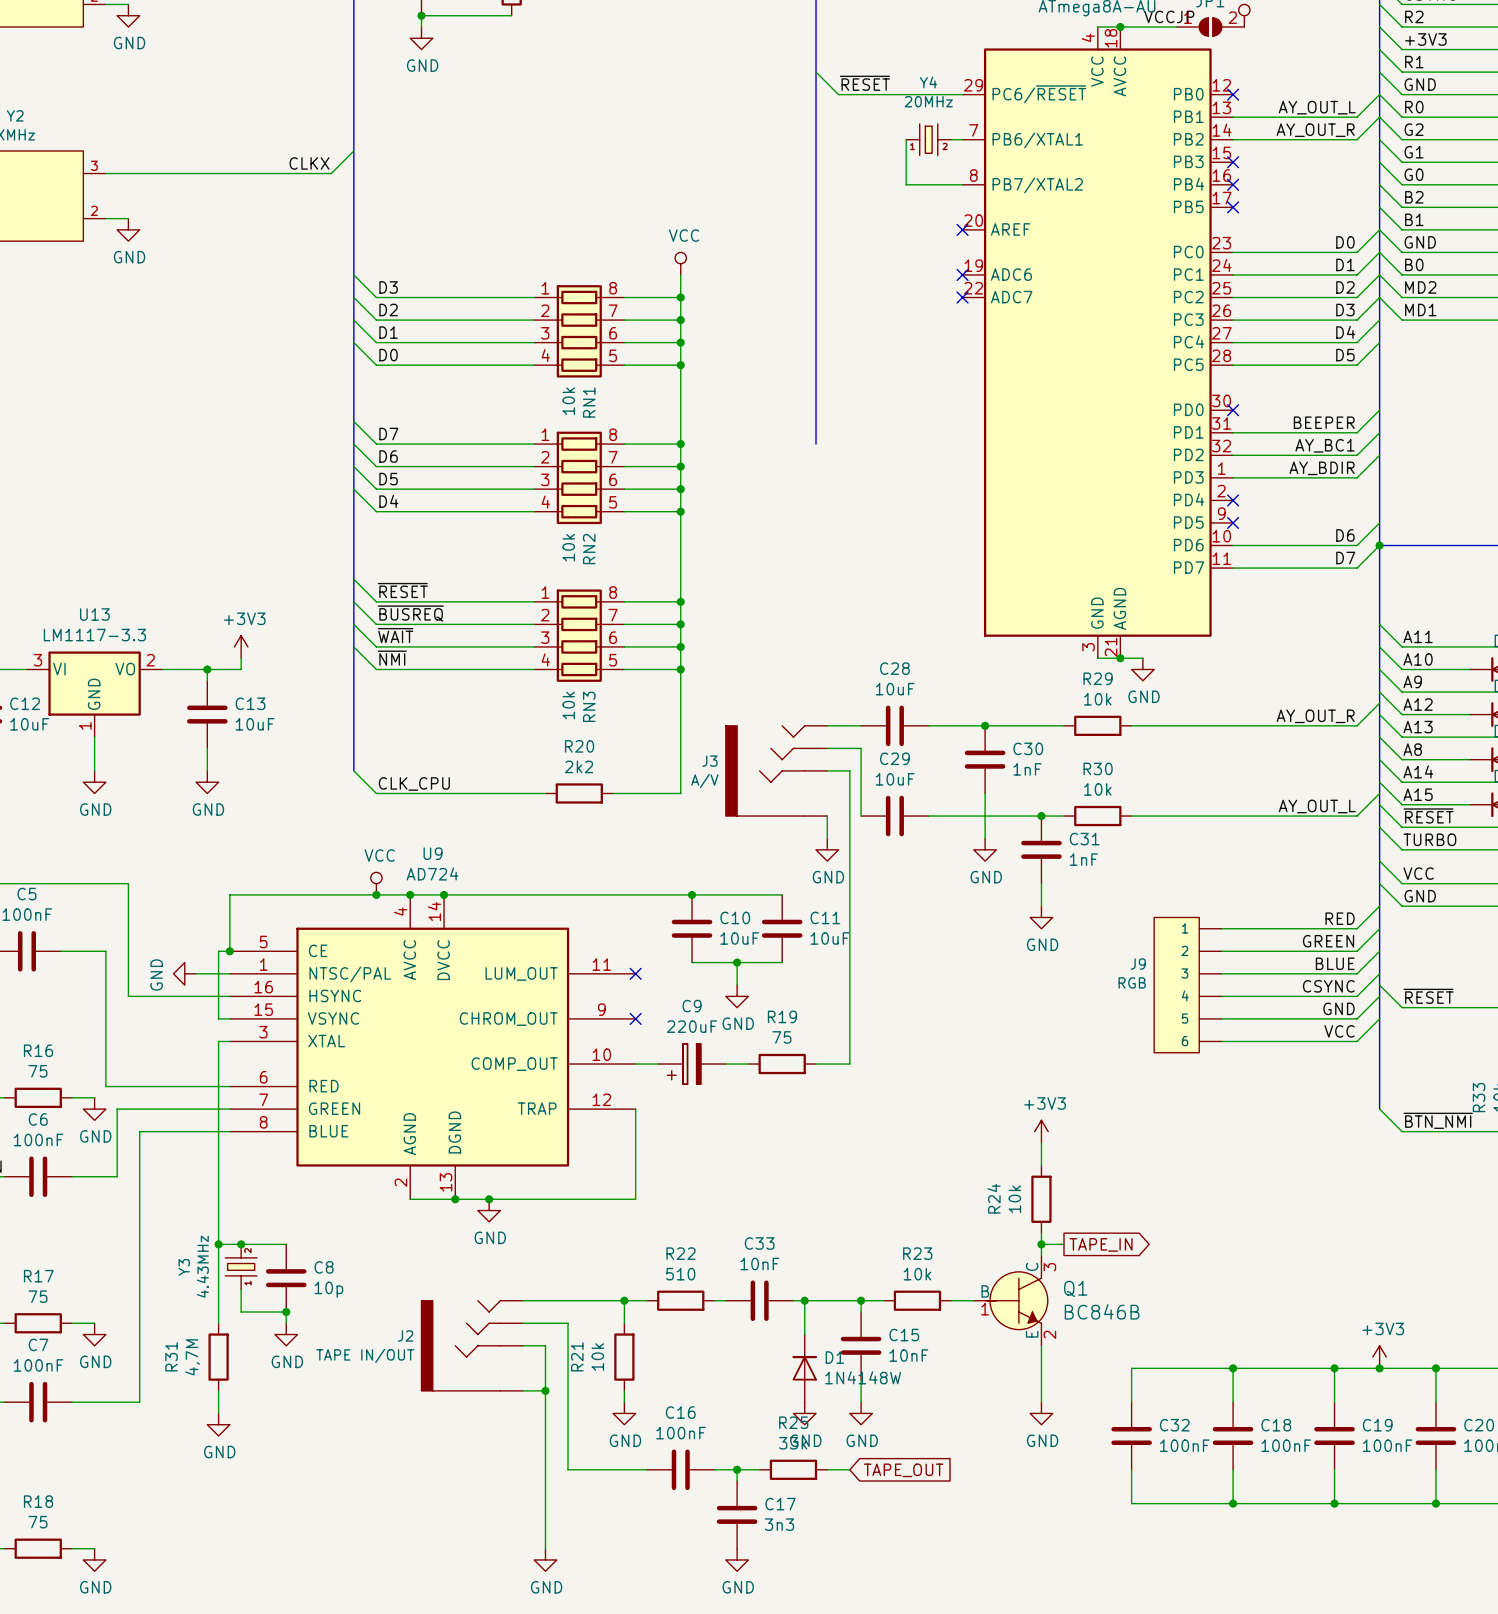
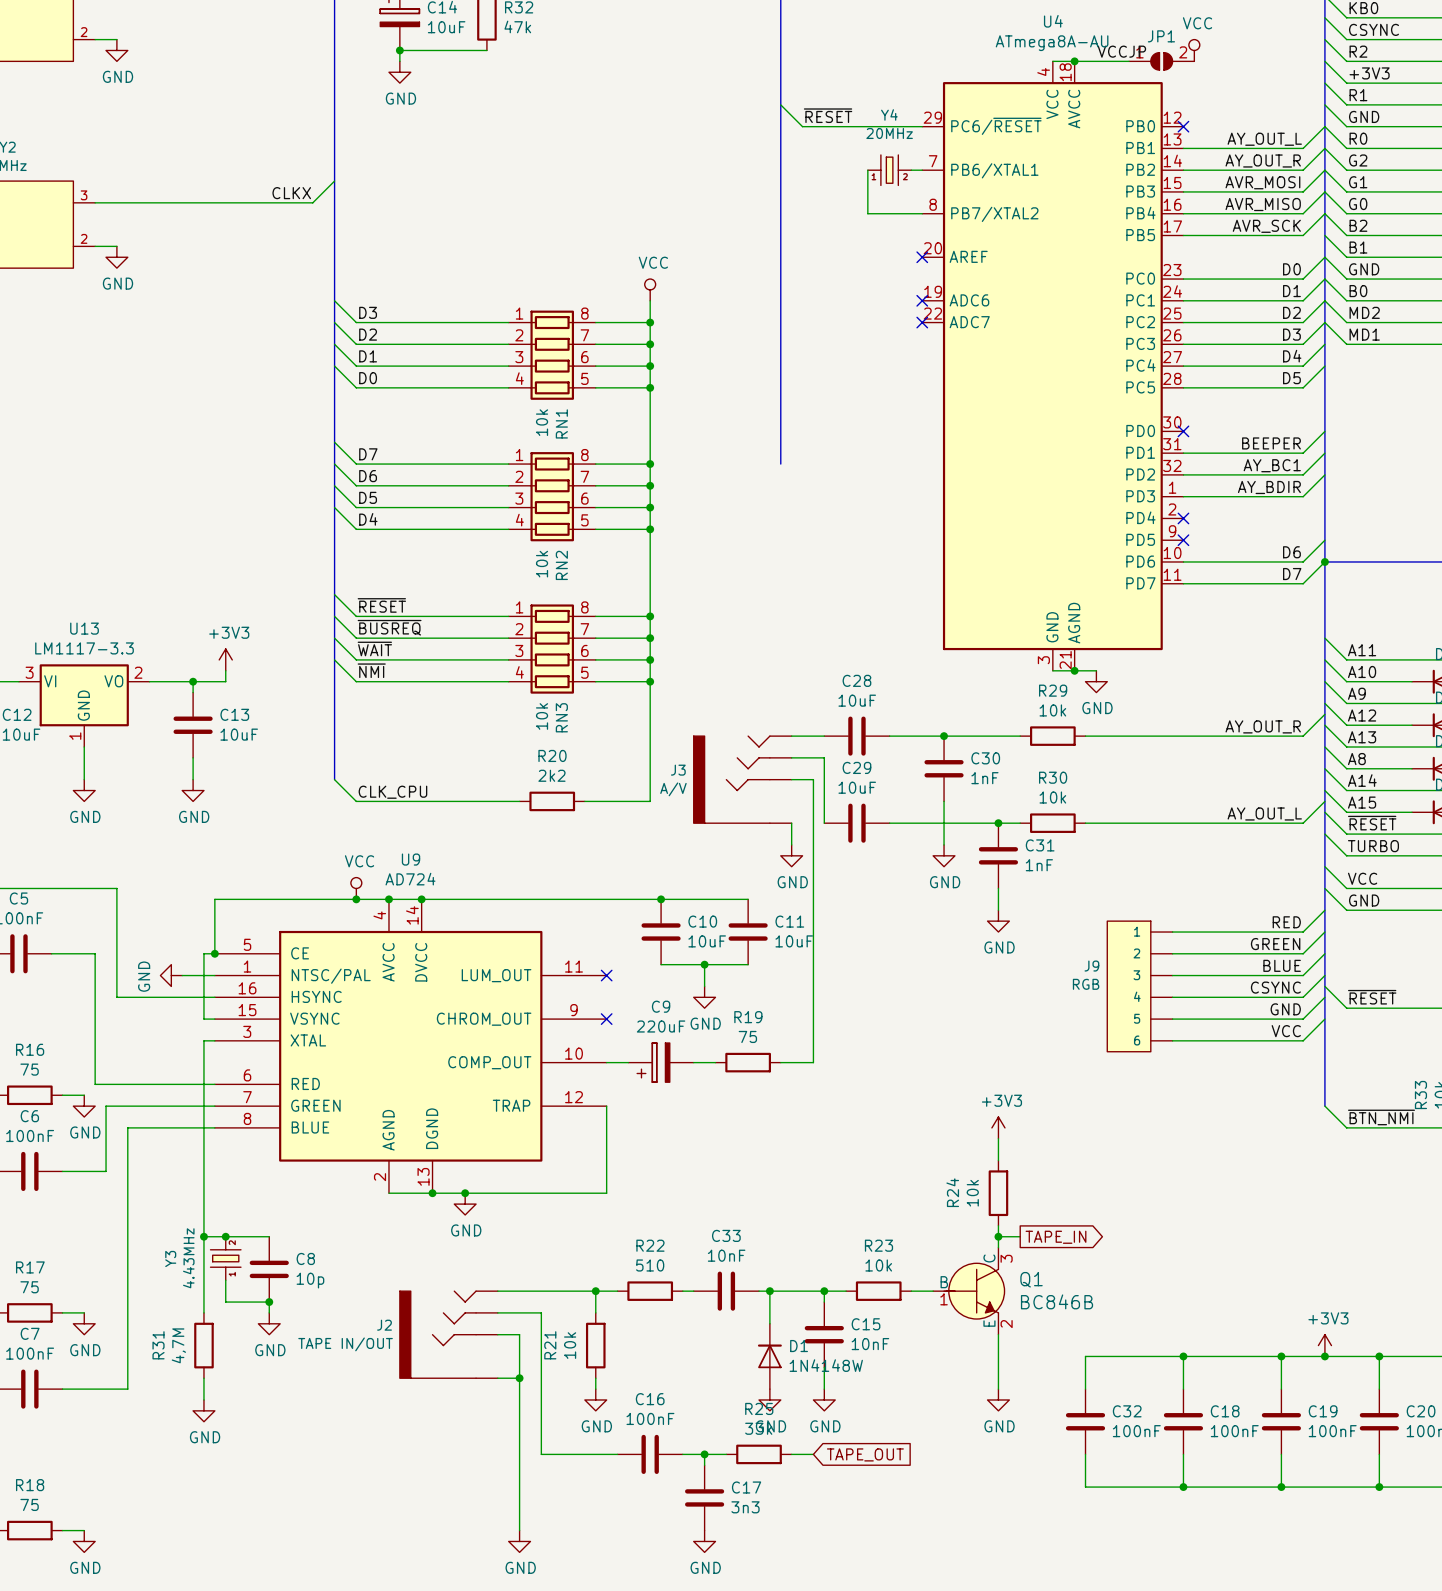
wire: none -> (1324, 170) (1303, 191) (1183, 191)
label: none -> AVR_MOSI (1262, 182)
no-connect mark: (1233, 162) -> none
wire: none -> (1324, 191) (1303, 213) (1183, 213)
label: none -> AVR_MISO (1263, 204)
no-connect mark: (1233, 184) -> none
wire: none -> (1324, 213) (1303, 235) (1183, 235)
label: none -> AVR_SCK (1266, 226)
no-connect mark: (1233, 207) -> none

